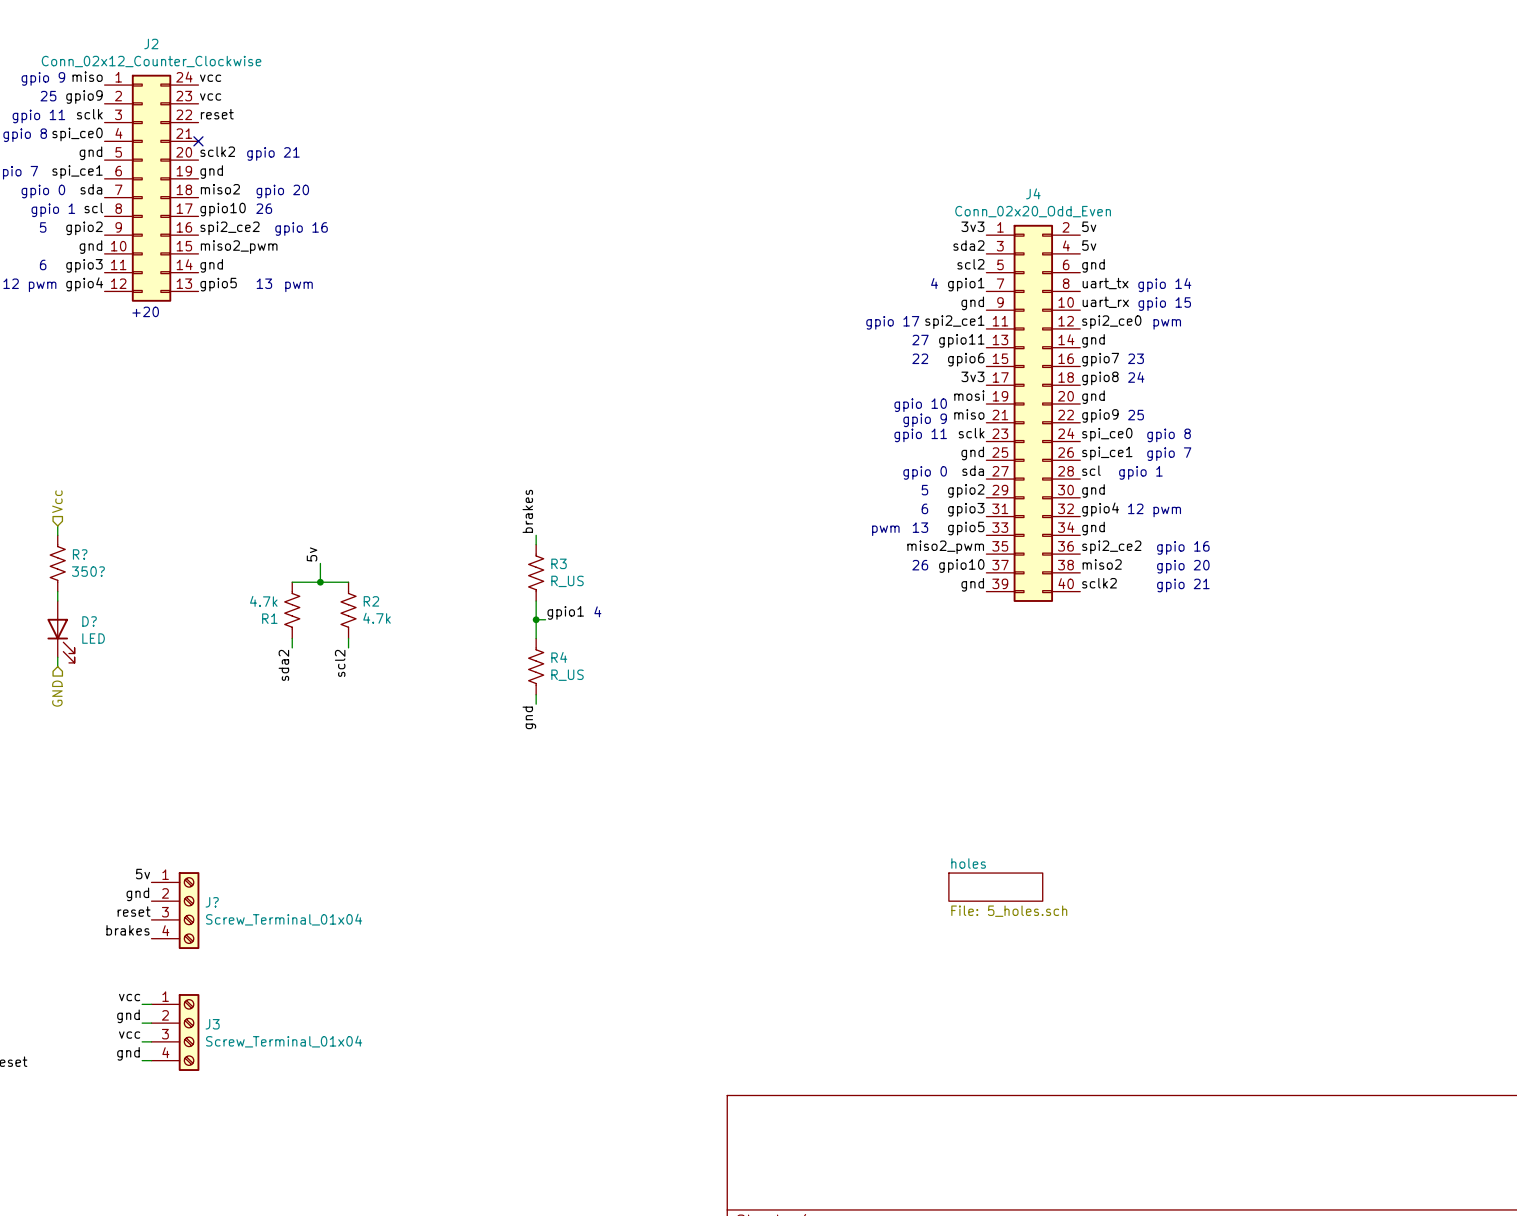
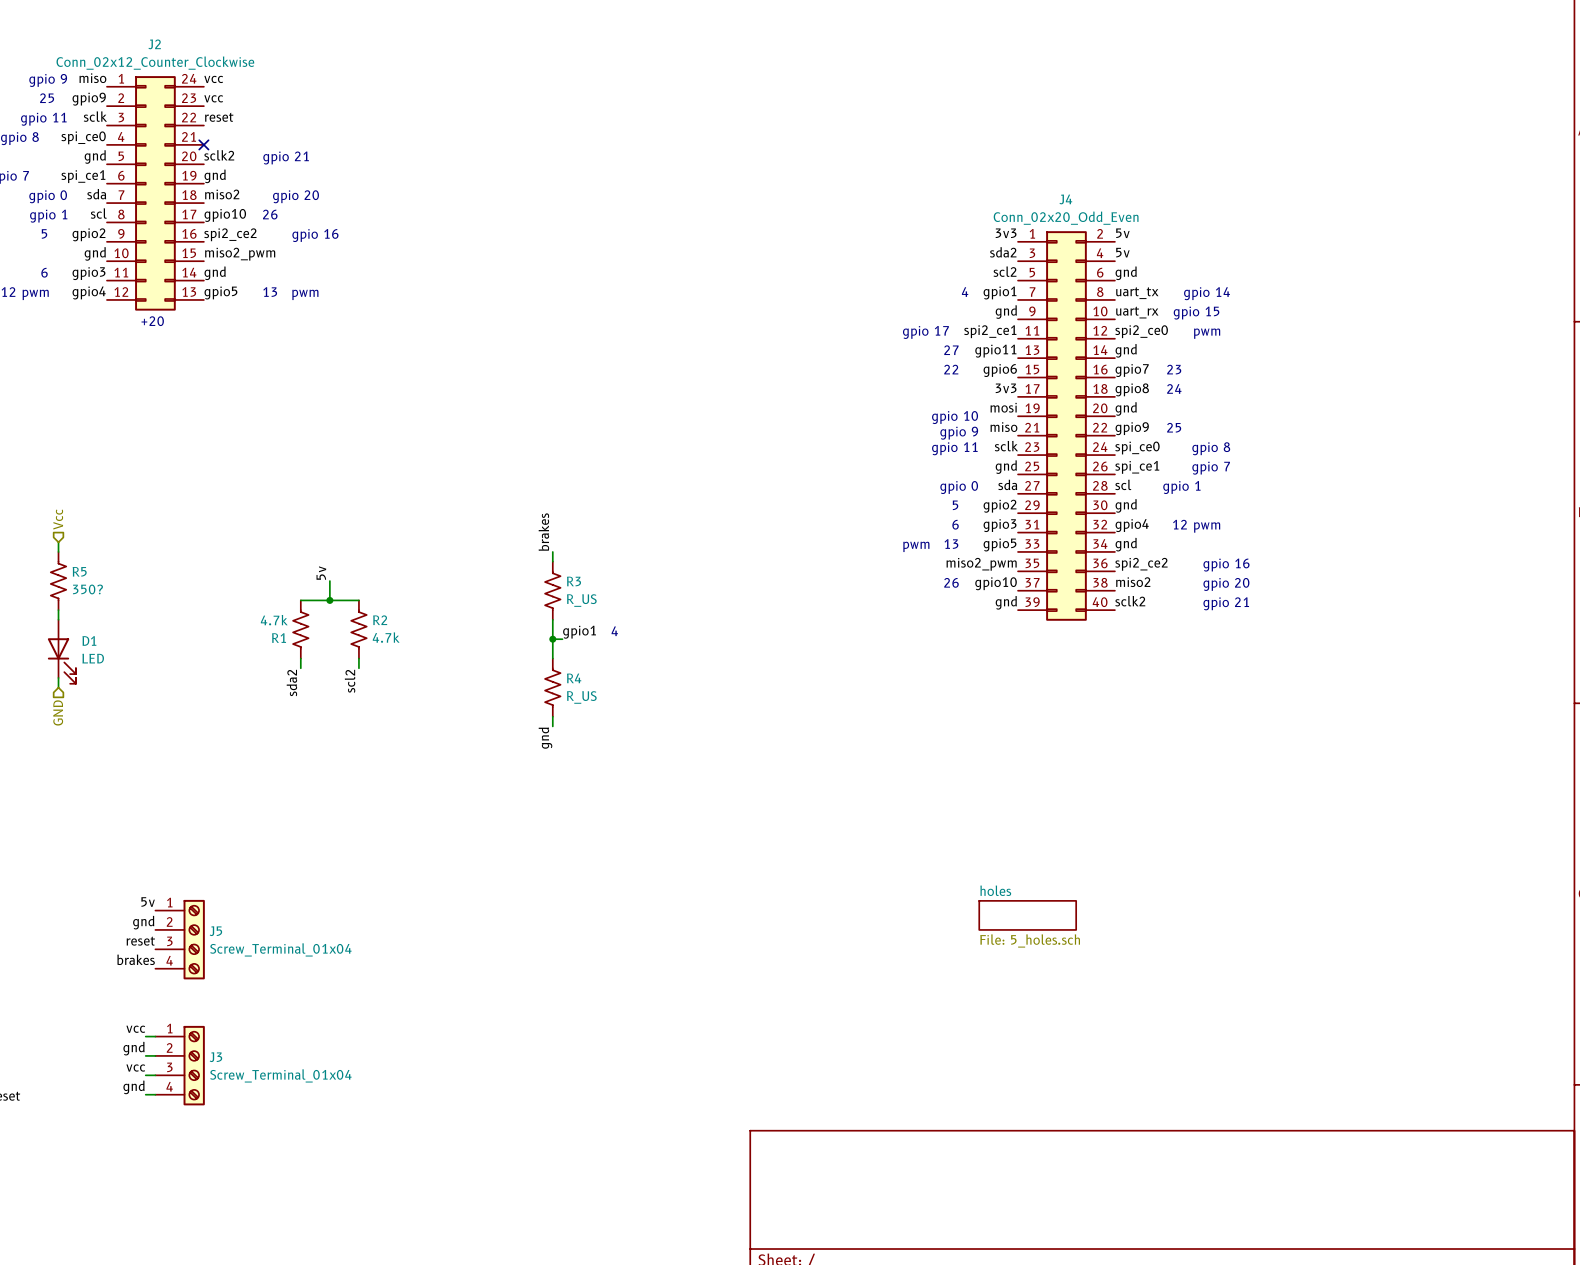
R? name: R? (80, 554) -> R5 (79, 571)
D? name: D? (89, 621) -> D1 (89, 640)
J? name: J? (212, 902) -> J5 (215, 931)

